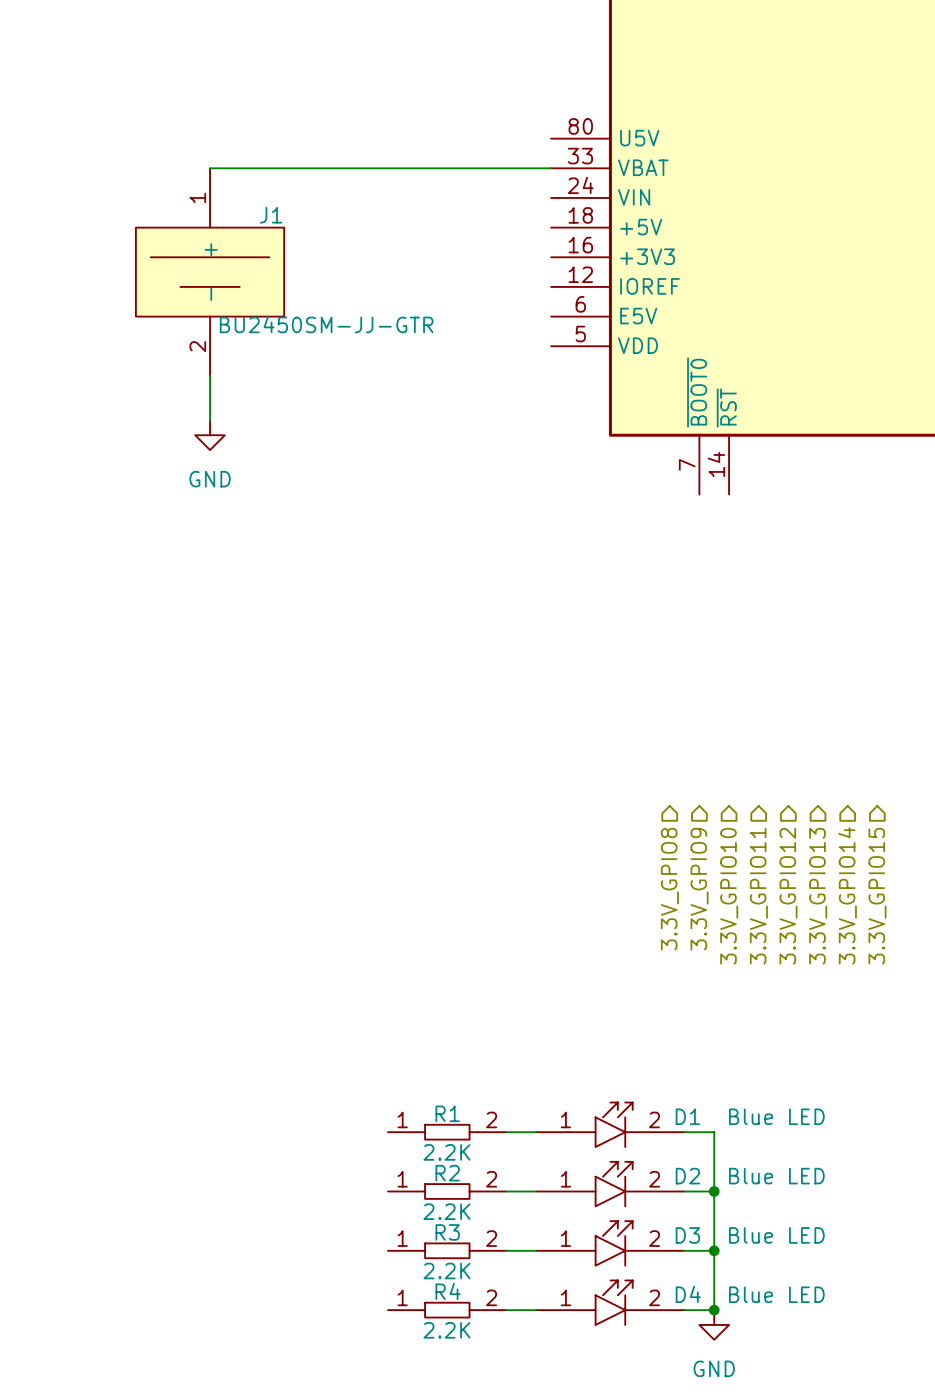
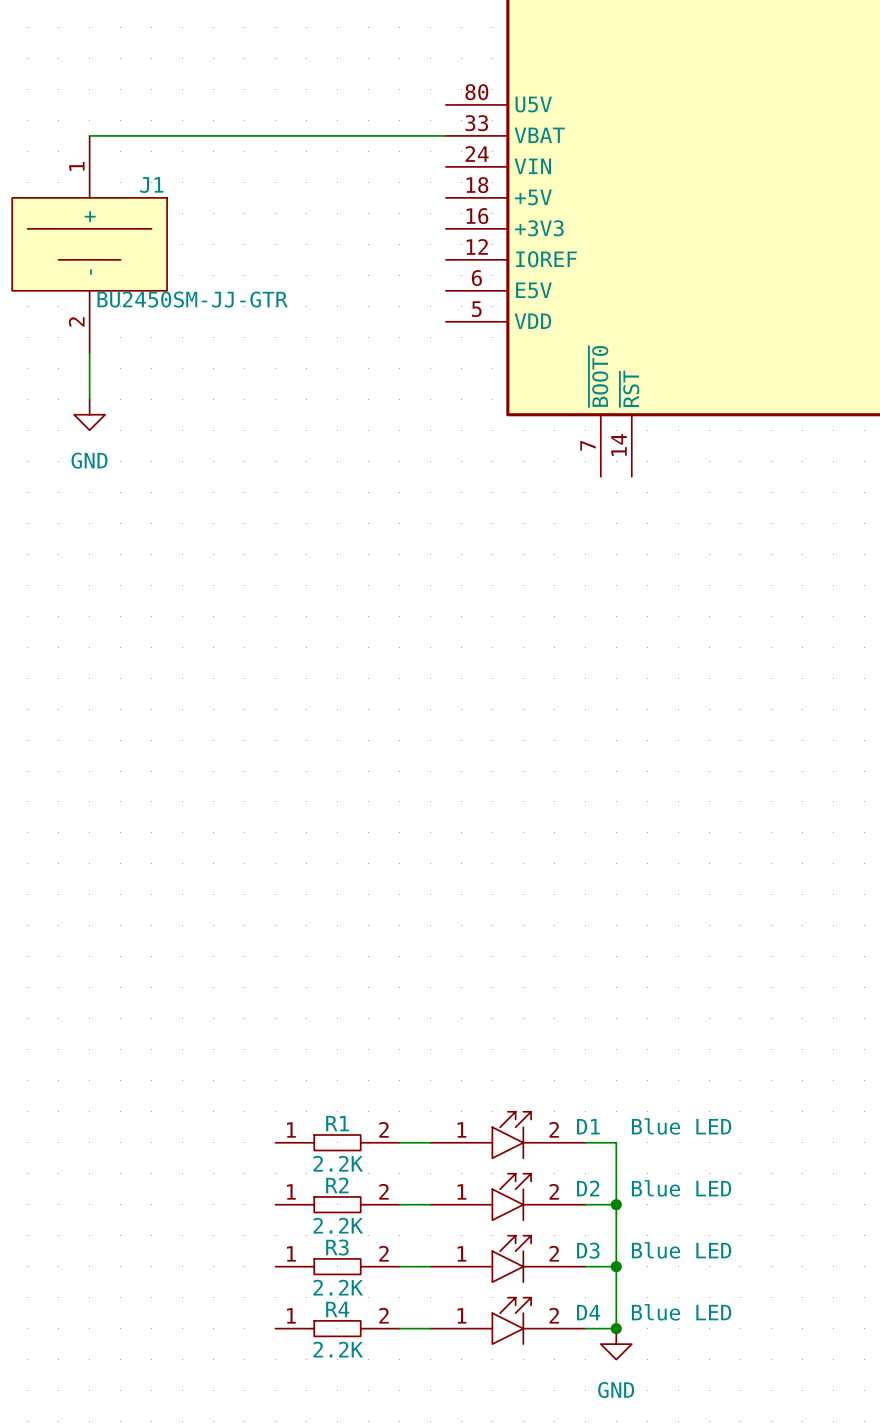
hierarchical label: 3.3V_GPIO8 (669, 889) -> none
hierarchical label: 3.3V_GPIO9 (699, 889) -> none
hierarchical label: 3.3V_GPIO14 (847, 895) -> none
hierarchical label: 3.3V_GPIO10 (729, 896) -> none
hierarchical label: 3.3V_GPIO11 (758, 896) -> none
hierarchical label: 3.3V_GPIO12 (788, 896) -> none
hierarchical label: 3.3V_GPIO13 (818, 896) -> none
hierarchical label: 3.3V_GPIO15 (877, 896) -> none

